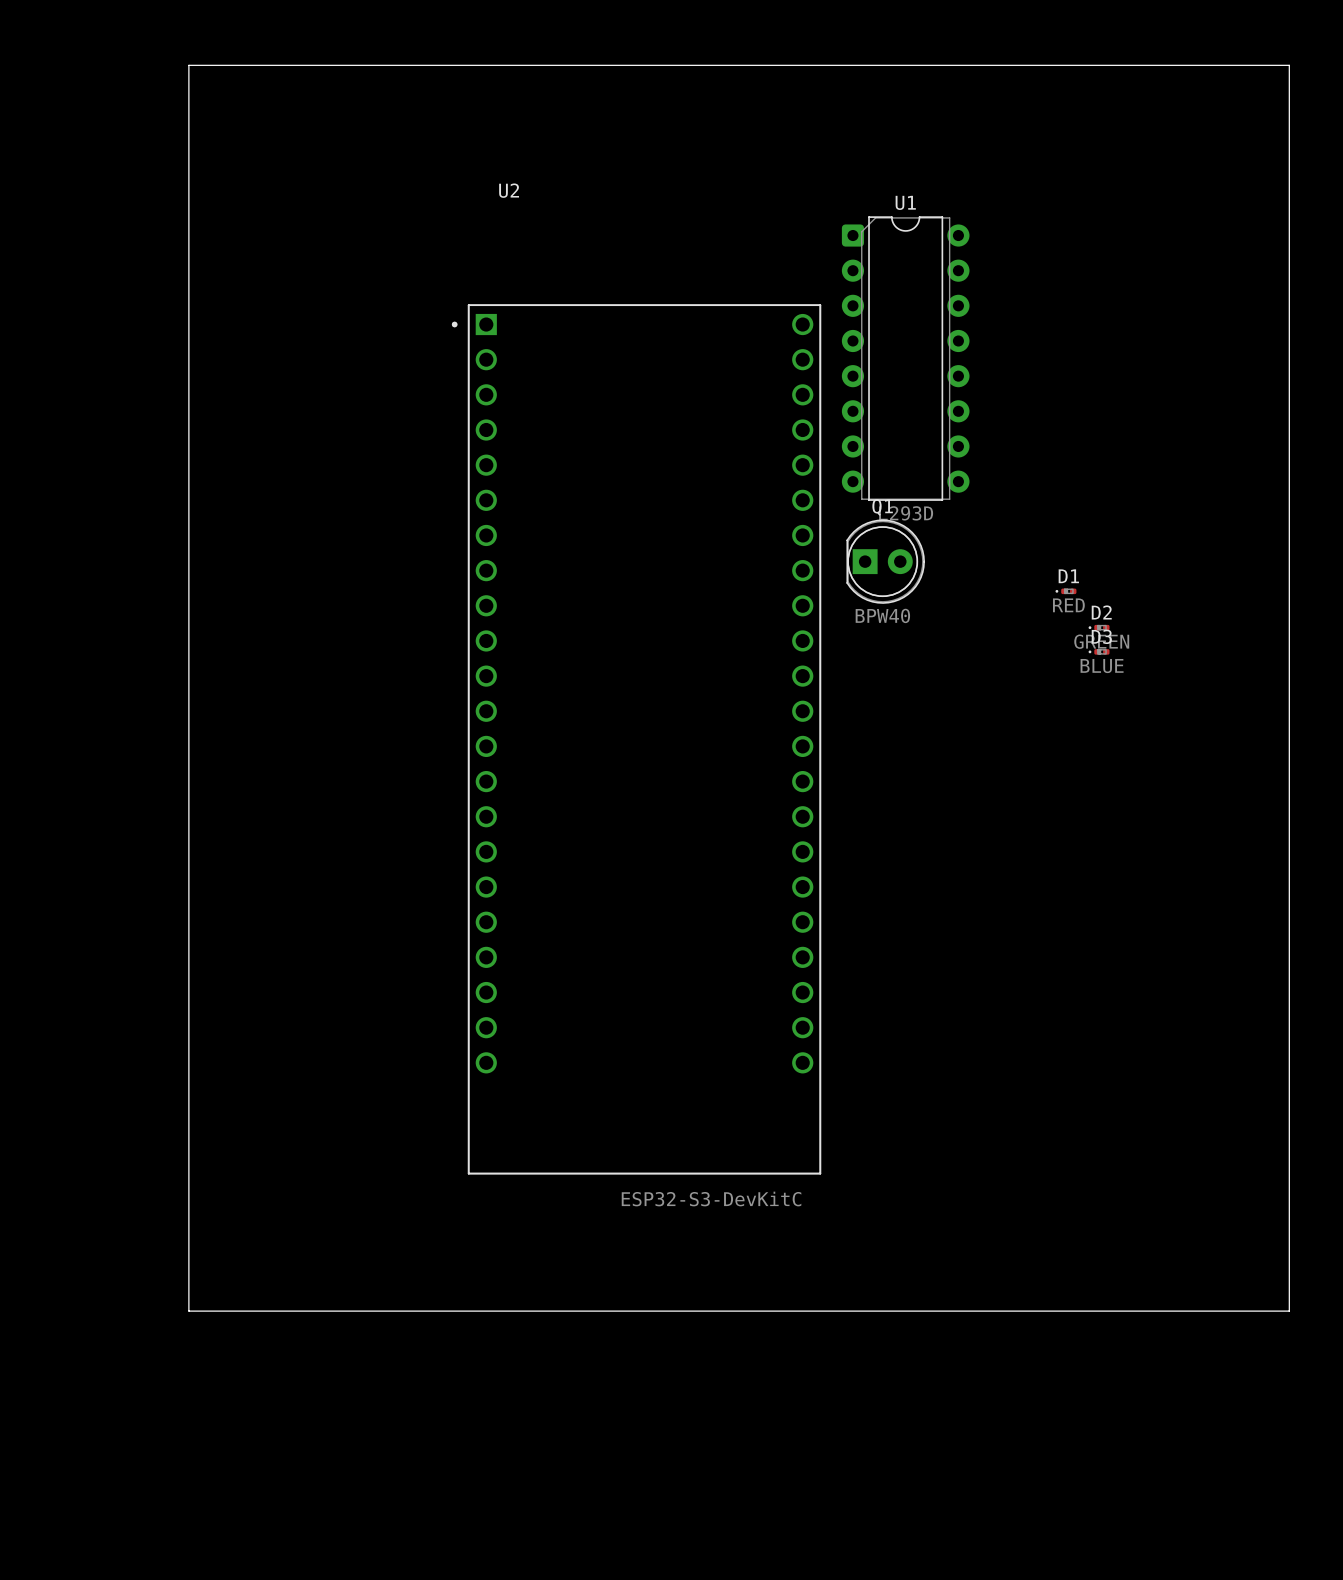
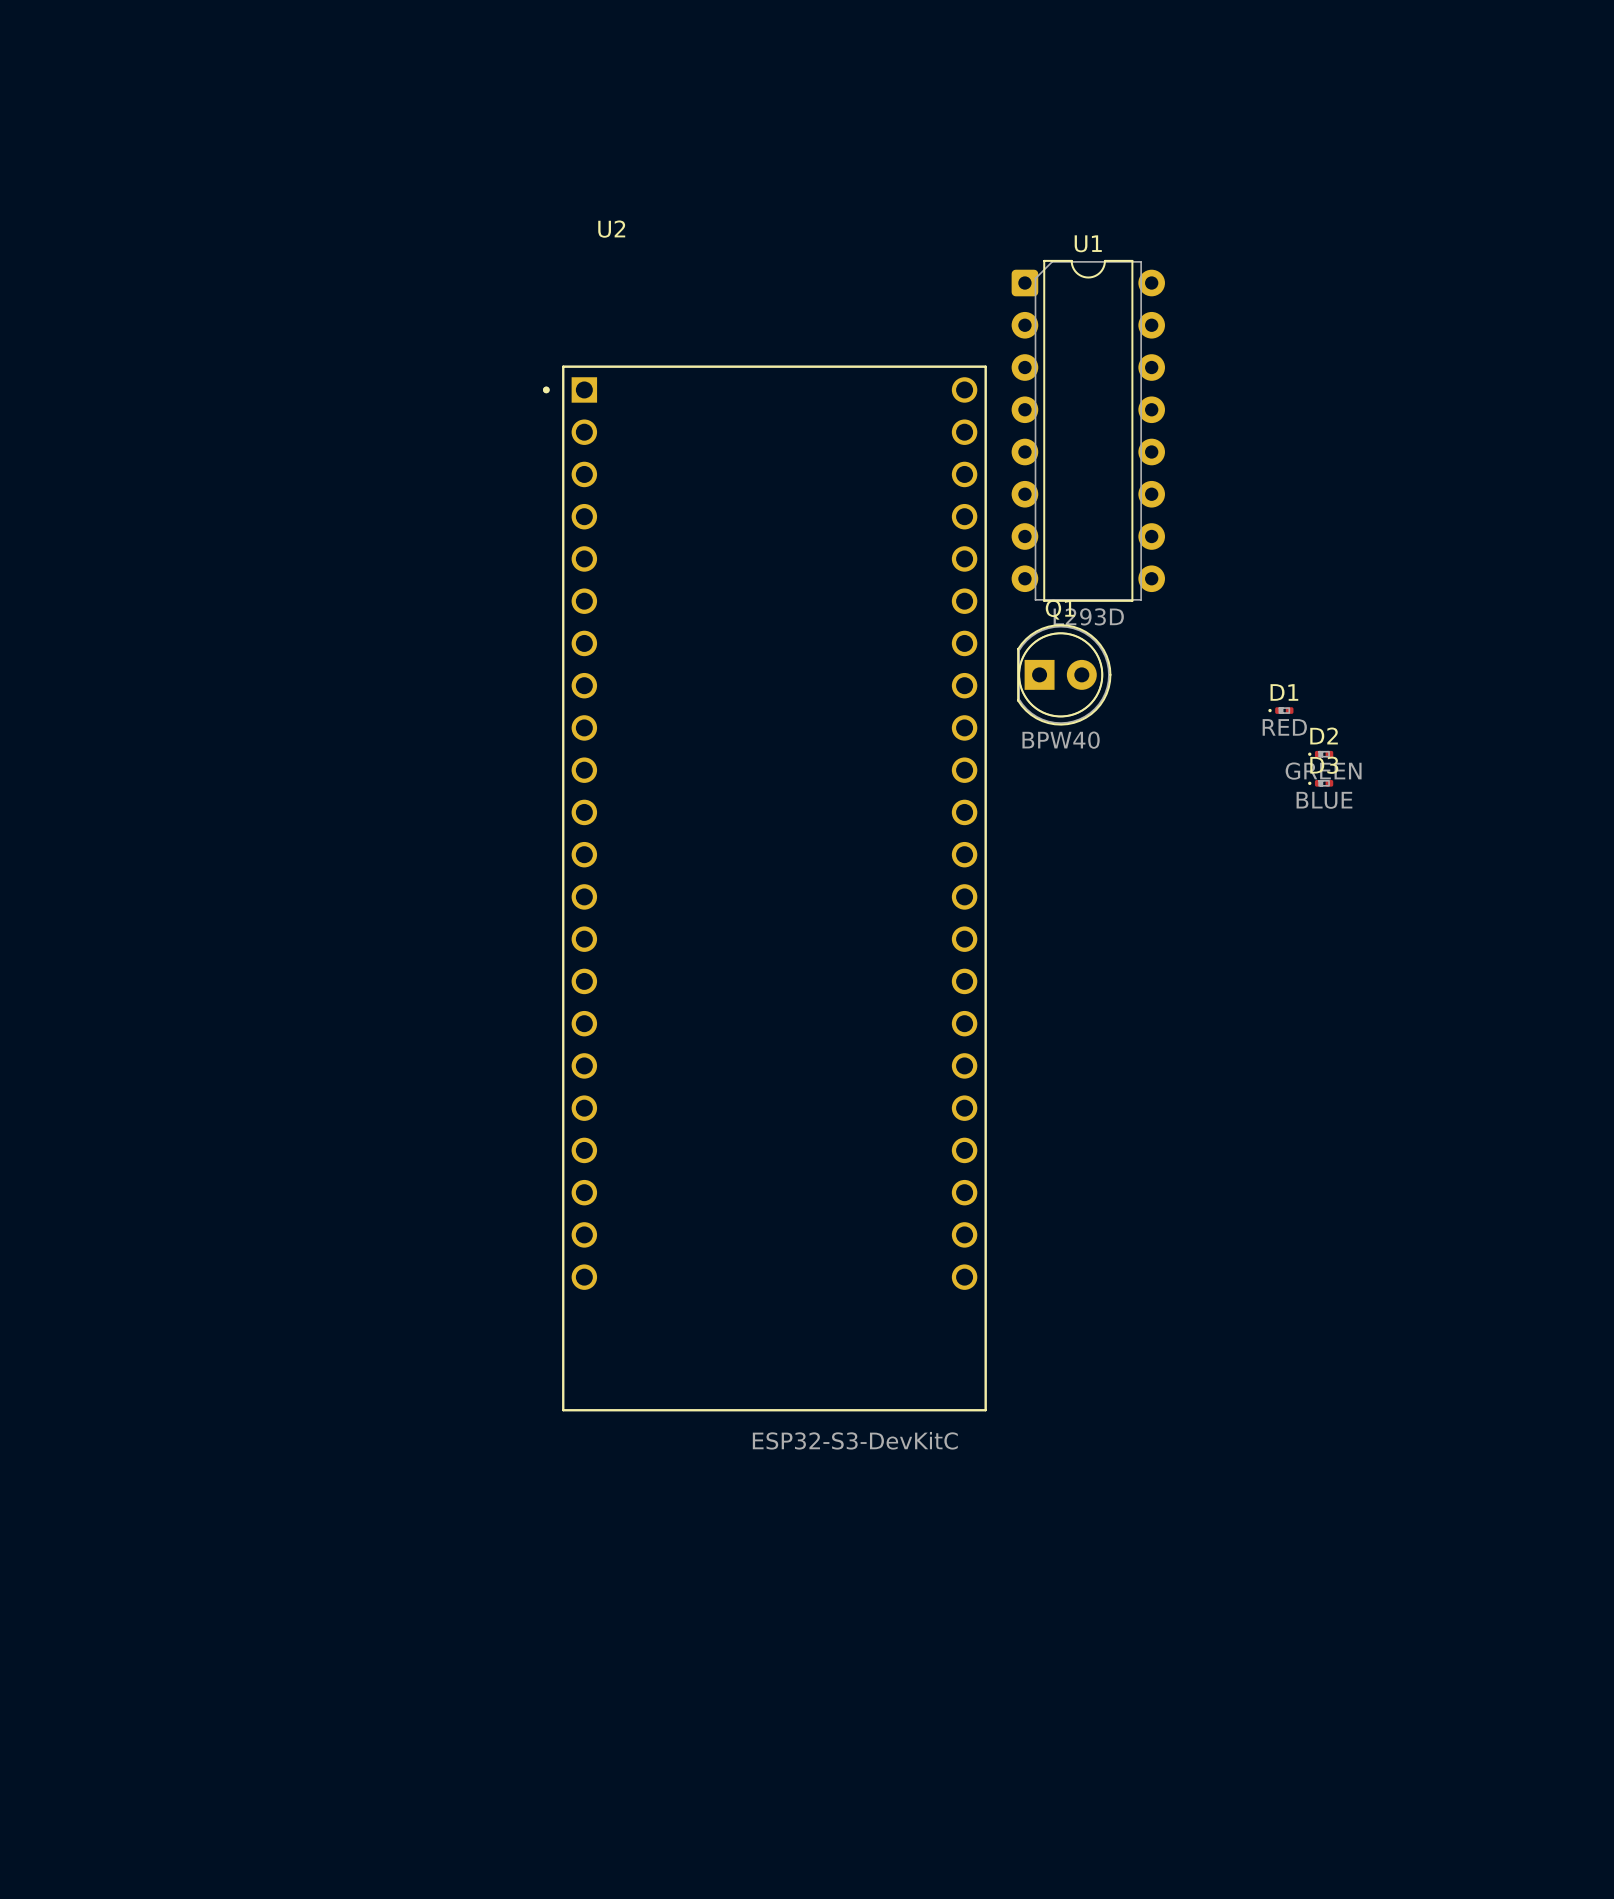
board edge: (188, 65) (1289, 65) (1289, 1311) (188, 1311) (188, 65) -> none

